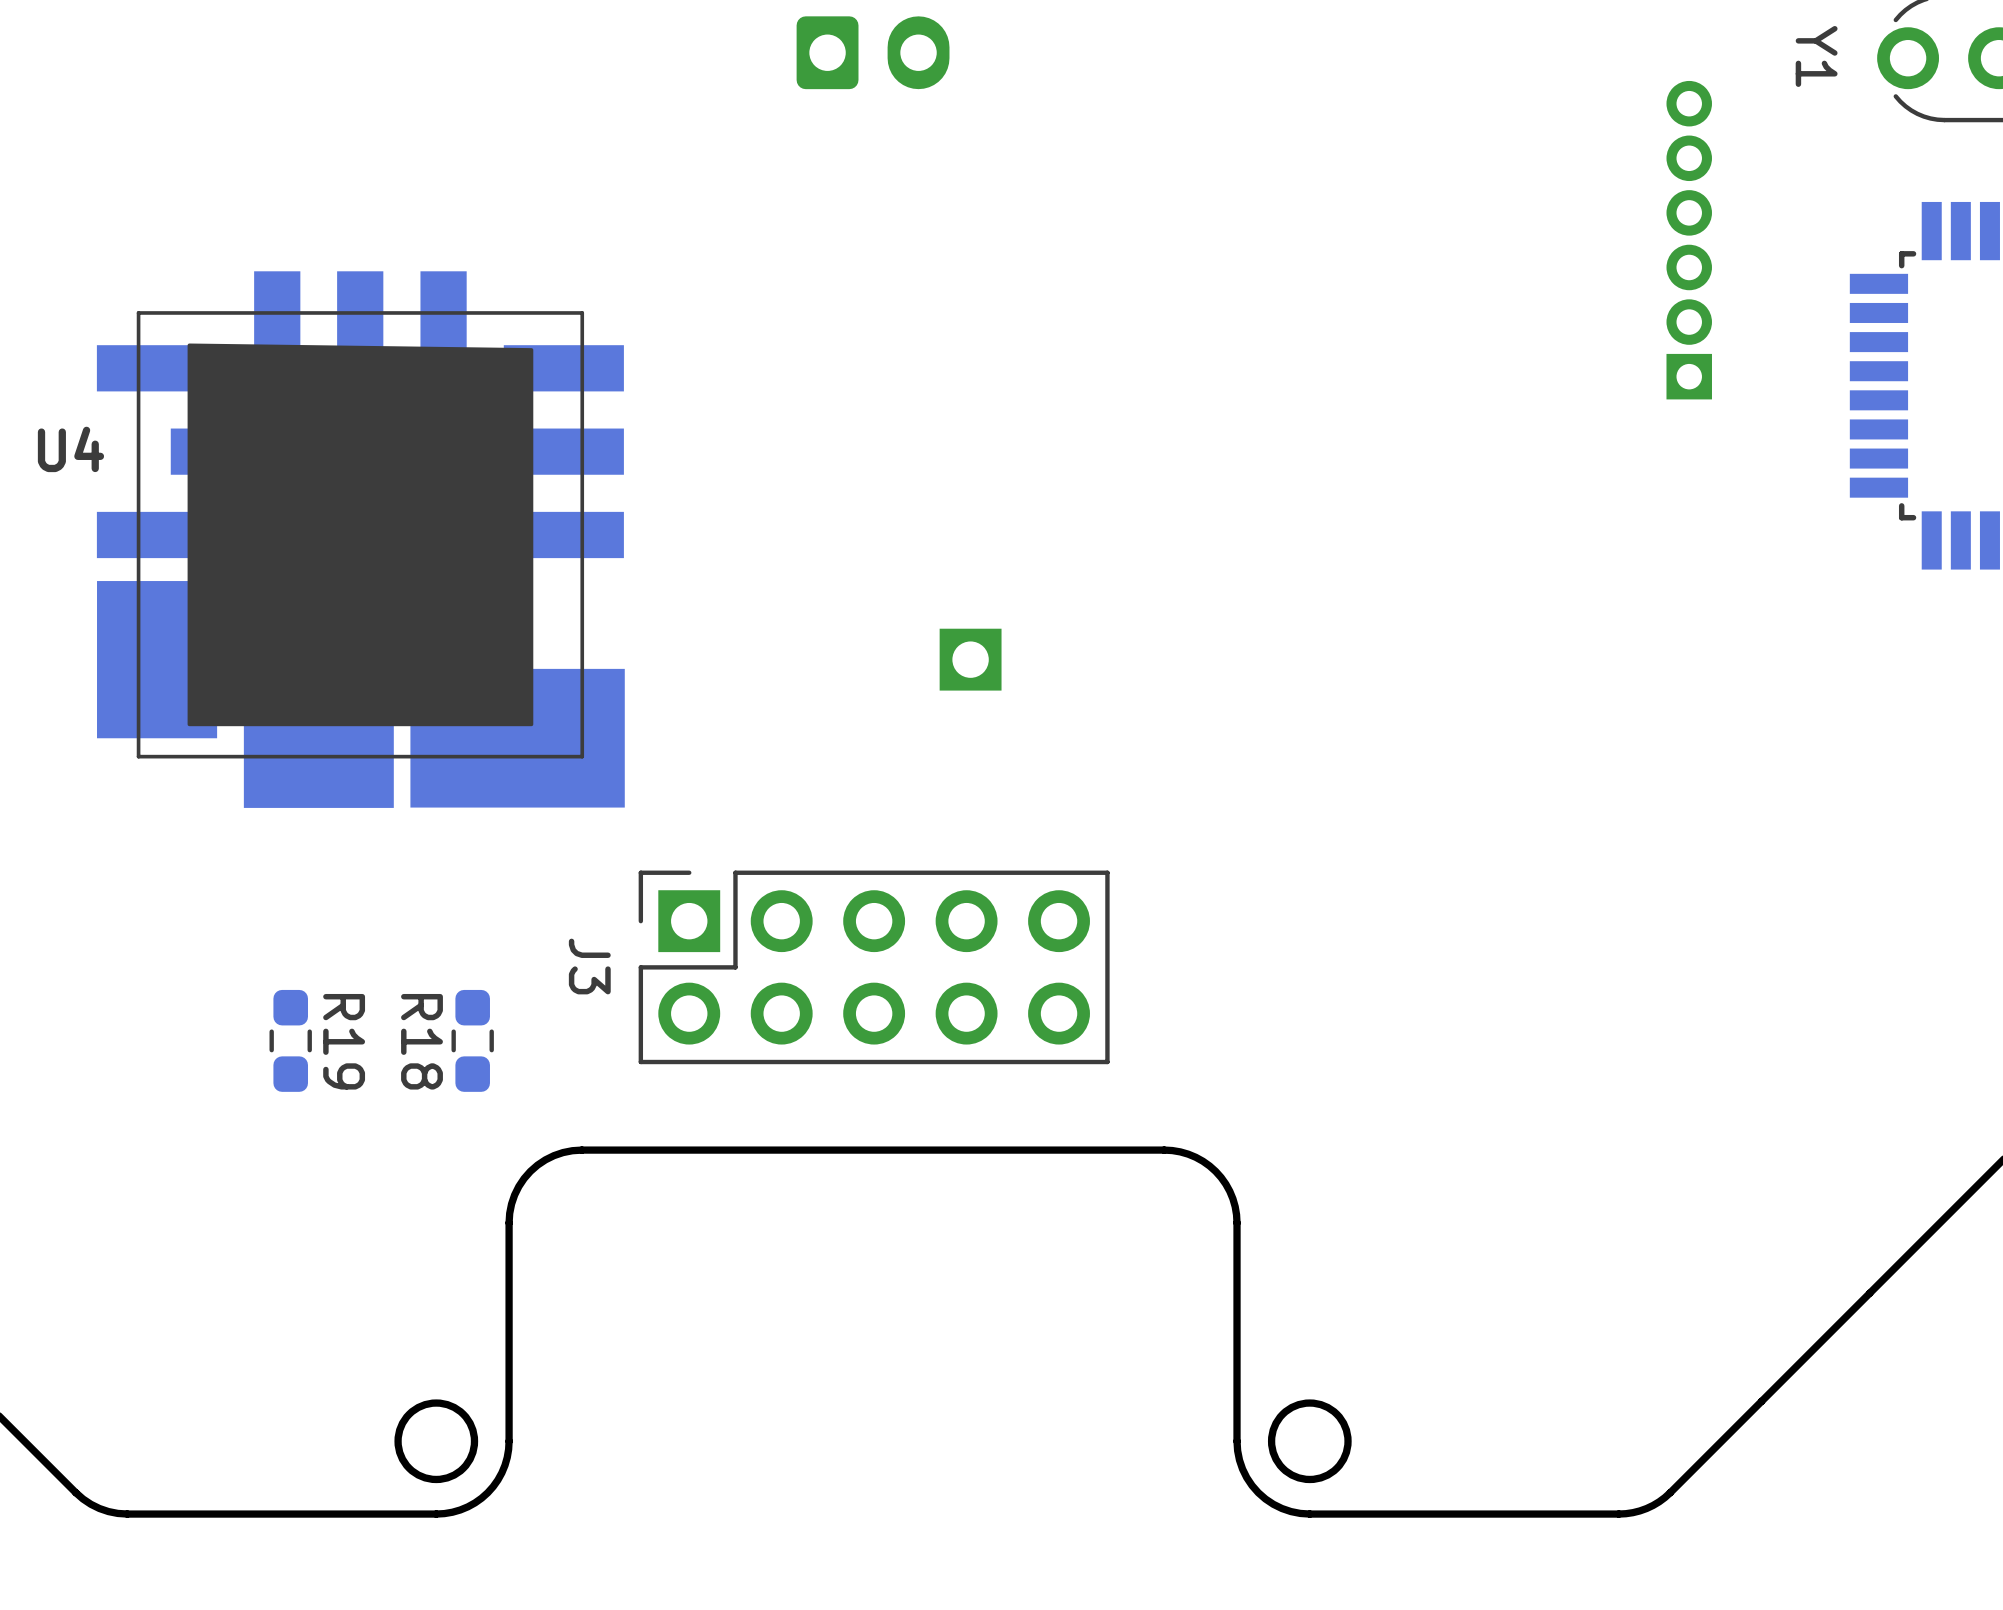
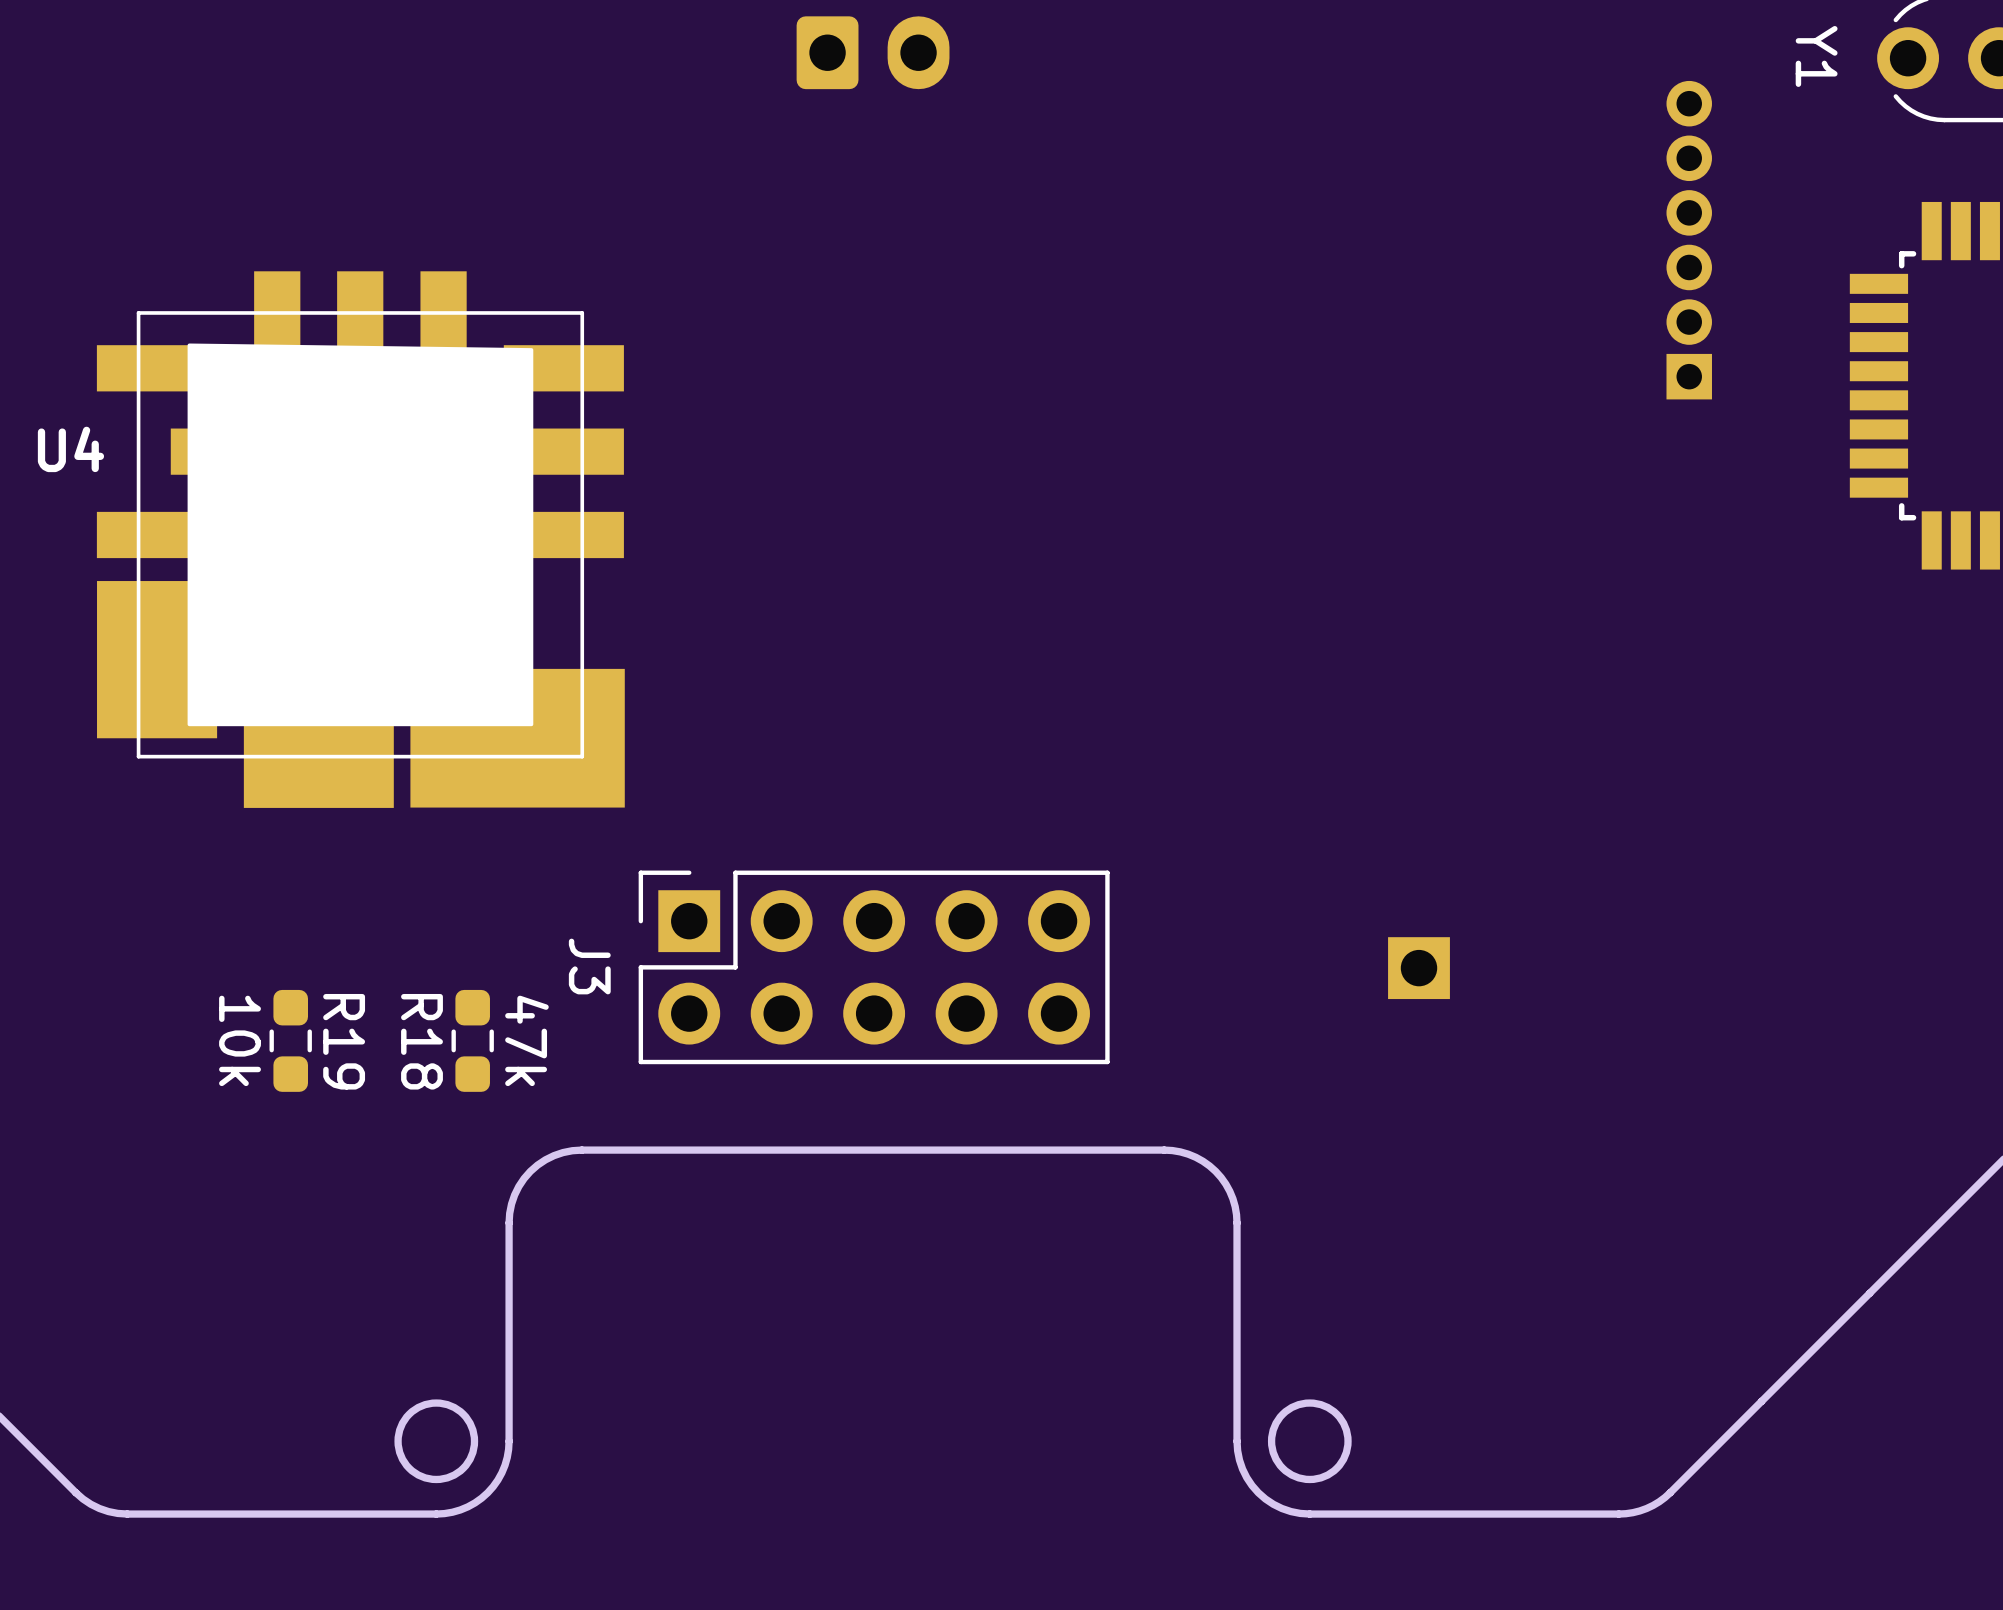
part position: (970, 659) -> (1418, 968)
R19 value: none -> 10k (240, 1040)
R18 value: none -> 47k (526, 1040)

